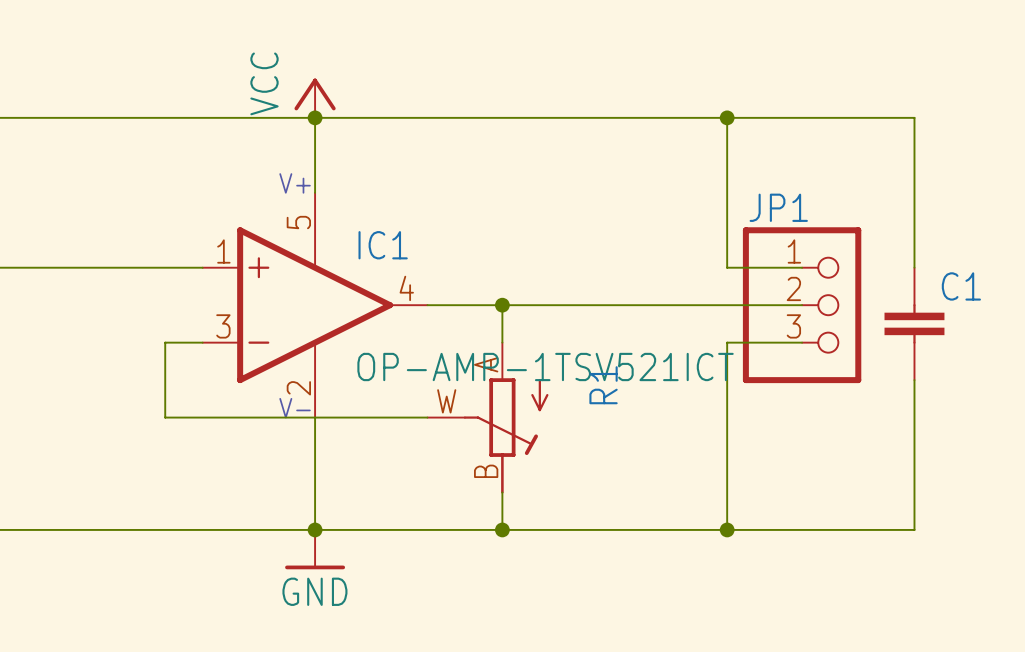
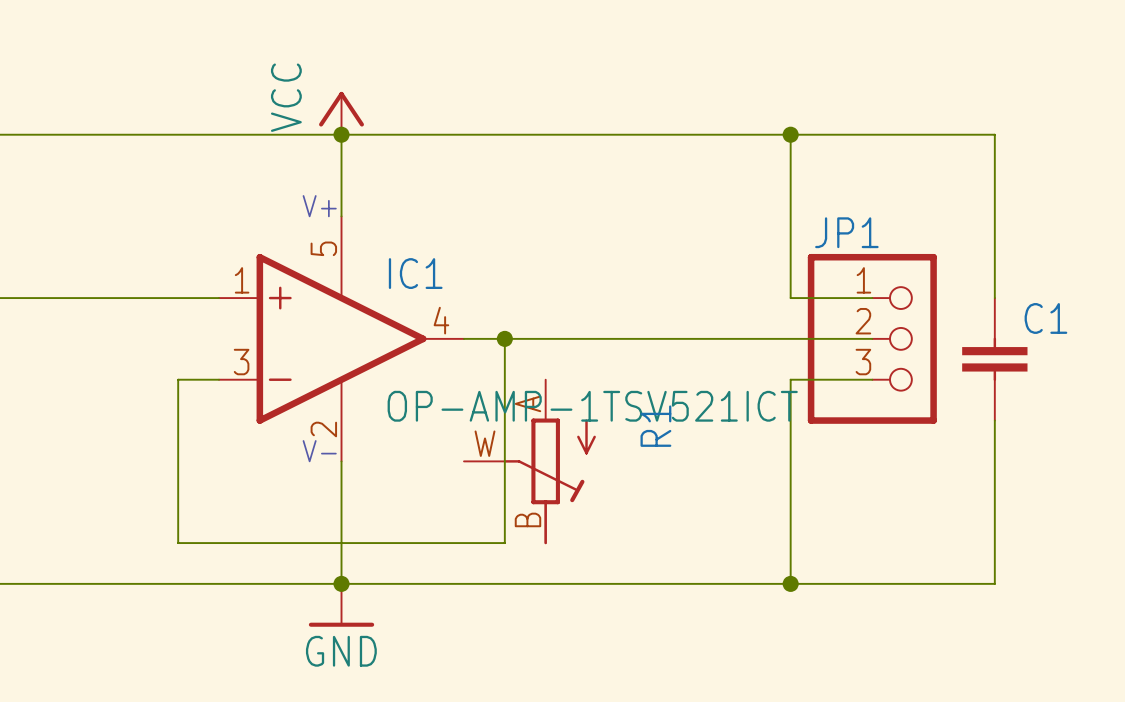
wire: (502, 305) (502, 342) -> none
junction position: (502, 305) -> (504, 338)
wire: (165, 417) (427, 417) -> (178, 461) (178, 543) (504, 543) (504, 338)
wire: (502, 492) (502, 529) -> none
junction: (502, 529) -> none

